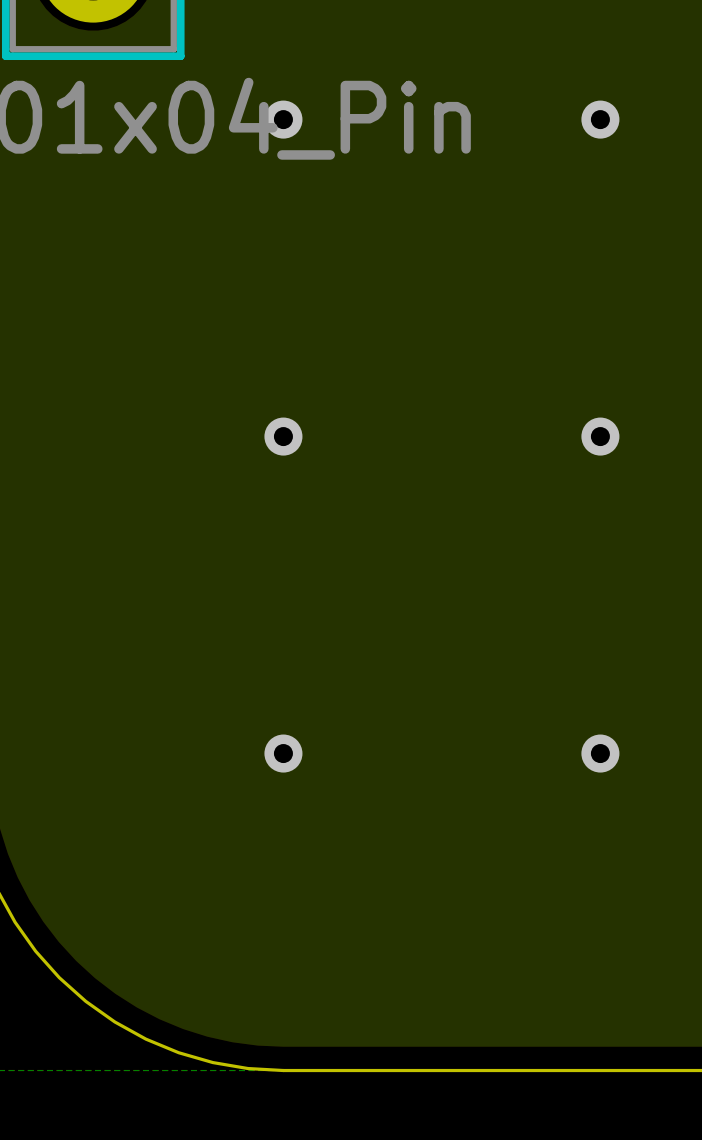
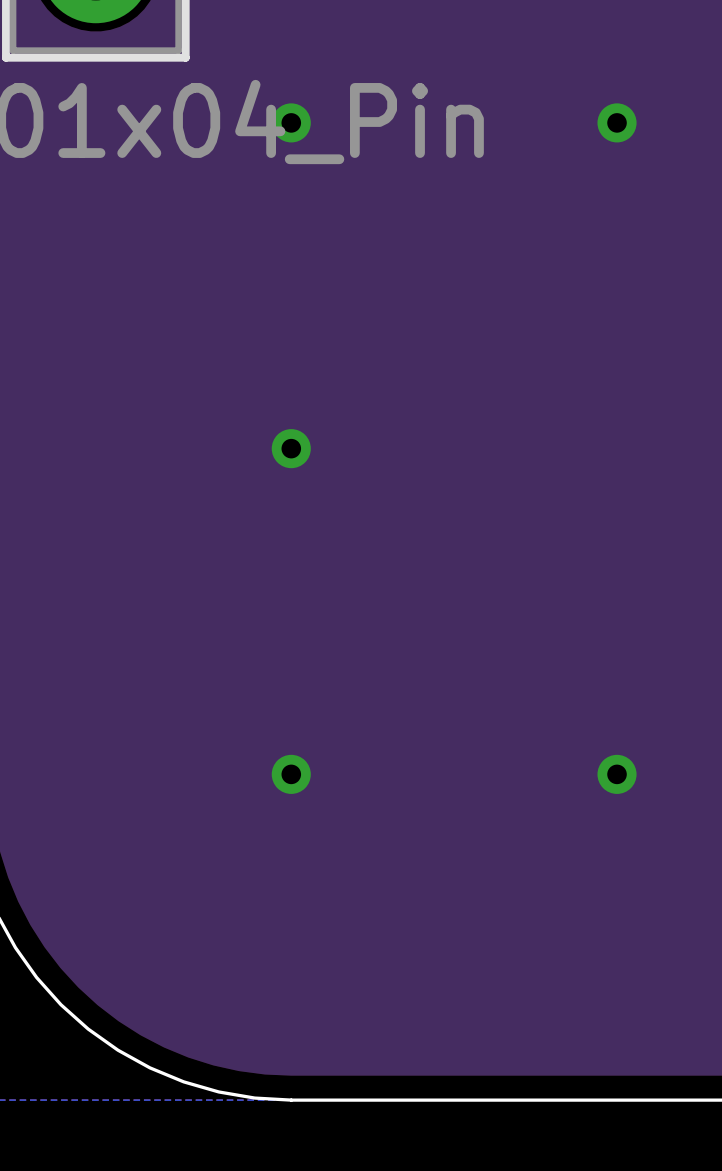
via: (600, 436) -> none

